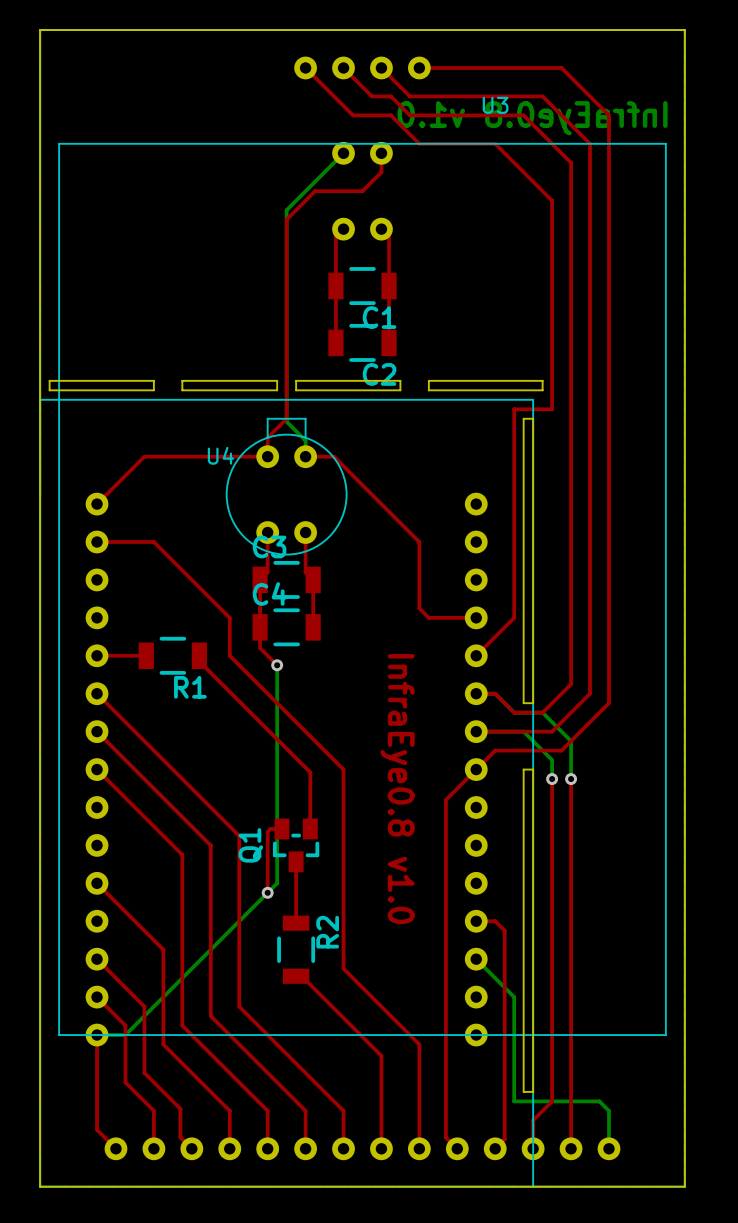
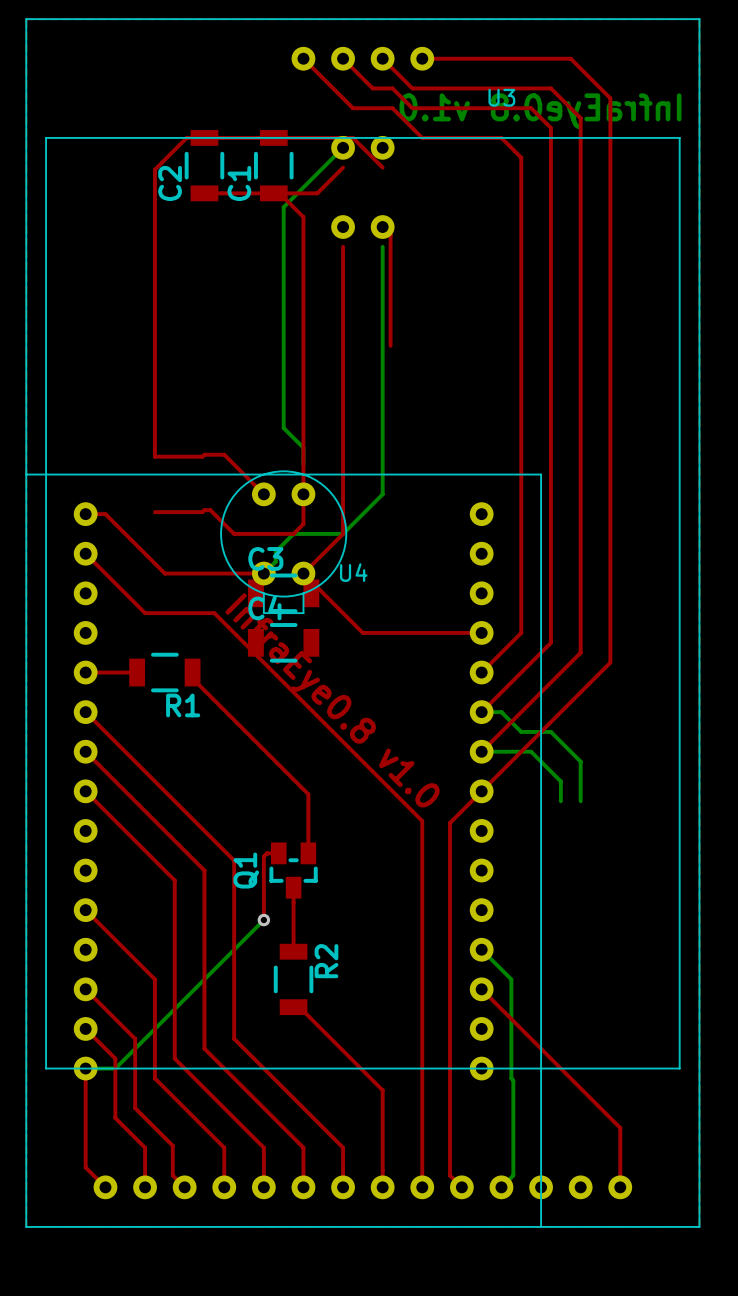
board edge: (40, 30) (40, 1186) (684, 1186) (684, 30) (40, 30) -> none
top track: (599, 105) (608, 115) (608, 703) (561, 750) (495, 750) -> (610, 98) (610, 662) (501, 771)
top track: (571, 124) (590, 143) (590, 693) (552, 731) (476, 731) -> none
top track: (542, 134) (571, 162) -> (580, 118) (580, 157)
top track: none -> (550, 128) (550, 642) (481, 712)
top track: (381, 153) (381, 172) (362, 191) (315, 191) (286, 219) (286, 418) (267, 437) (267, 456) (144, 456) (97, 504) -> none
top track: (514, 162) (552, 200) (552, 409) (514, 409) -> (521, 157) (521, 415)
top track: none -> (343, 167) (317, 193) (204, 193)
top track: none -> (382, 167) (352, 137) (186, 137) (154, 169) (154, 456) (224, 454) (263, 494)
top track: none -> (279, 193) (303, 217) (303, 524) (293, 533) (234, 533) (210, 510) (202, 512) (154, 512)
top track: (343, 229) (335, 236) (335, 342) -> none
bottom track: none -> (382, 246) (382, 494) (343, 533) (293, 533) (275, 551) (275, 561) (263, 573)
C1 rotation: 0° (362, 286) -> 90° clockwise (273, 165)
C1 position: (362, 286) -> (273, 165)
C2 rotation: 0° (362, 342) -> 90° clockwise (204, 165)
C2 position: (362, 342) -> (204, 165)
board edge: (49, 380) (153, 380) (153, 390) (49, 390) (49, 380) -> none
board edge: (182, 380) (277, 380) (277, 390) (182, 390) (182, 380) -> none
board edge: (296, 380) (400, 380) (400, 390) (296, 390) (296, 380) -> none
board edge: (428, 380) (542, 380) (542, 390) (428, 390) (428, 380) -> none
board edge: (523, 418) (533, 418) (533, 703) (523, 703) (523, 418) -> none
top track: (305, 456) (334, 456) (419, 542) (419, 608) (428, 617) -> (343, 246) (343, 533) (303, 573) (362, 632) (432, 632)
line: (533, 466) (533, 399) (40, 399) (40, 494) -> (541, 474) (26, 474)
U4 rotation: 0° (286, 486) -> 180° (283, 542)
top track: (267, 532) (267, 572) (260, 579) (260, 648) (277, 665) -> none
top track: (305, 532) (305, 572) (313, 579) (313, 627) -> none
top track: (97, 542) (153, 542) -> (85, 514) (105, 514) (145, 553)
top track: (172, 560) (229, 617) (229, 655) (343, 769) (343, 968) (419, 1044) -> (85, 553) (145, 613) (214, 613) (422, 821) (422, 1078)
top track: none -> (164, 573) (263, 573)
top track: (571, 636) (571, 684) (542, 712) (514, 712) (495, 693) (476, 693) -> (580, 652) (481, 751)
bottom track: (277, 665) (277, 883) (267, 892) -> none
via: (277, 665) -> none
board edge: (523, 769) (523, 1091) (533, 1091) (533, 769) (523, 769) -> none
top track: (552, 779) (552, 1101) (533, 1120) (533, 1148) -> none
via: (552, 779) -> none
top track: (571, 779) (571, 1148) -> none
via: (571, 779) -> none
text rotation: 0° (397, 789) -> 45° counterclockwise (332, 700)
top track: (476, 921) (495, 921) (504, 930) (504, 1139) (495, 1148) -> none
bottom track: none -> (481, 949) (511, 979) (513, 1175) (501, 1187)
top track: none -> (481, 989) (620, 1127) (620, 1187)
bottom track: (476, 959) (514, 997) (514, 1101) (599, 1101) (608, 1110) (608, 1148) -> none

